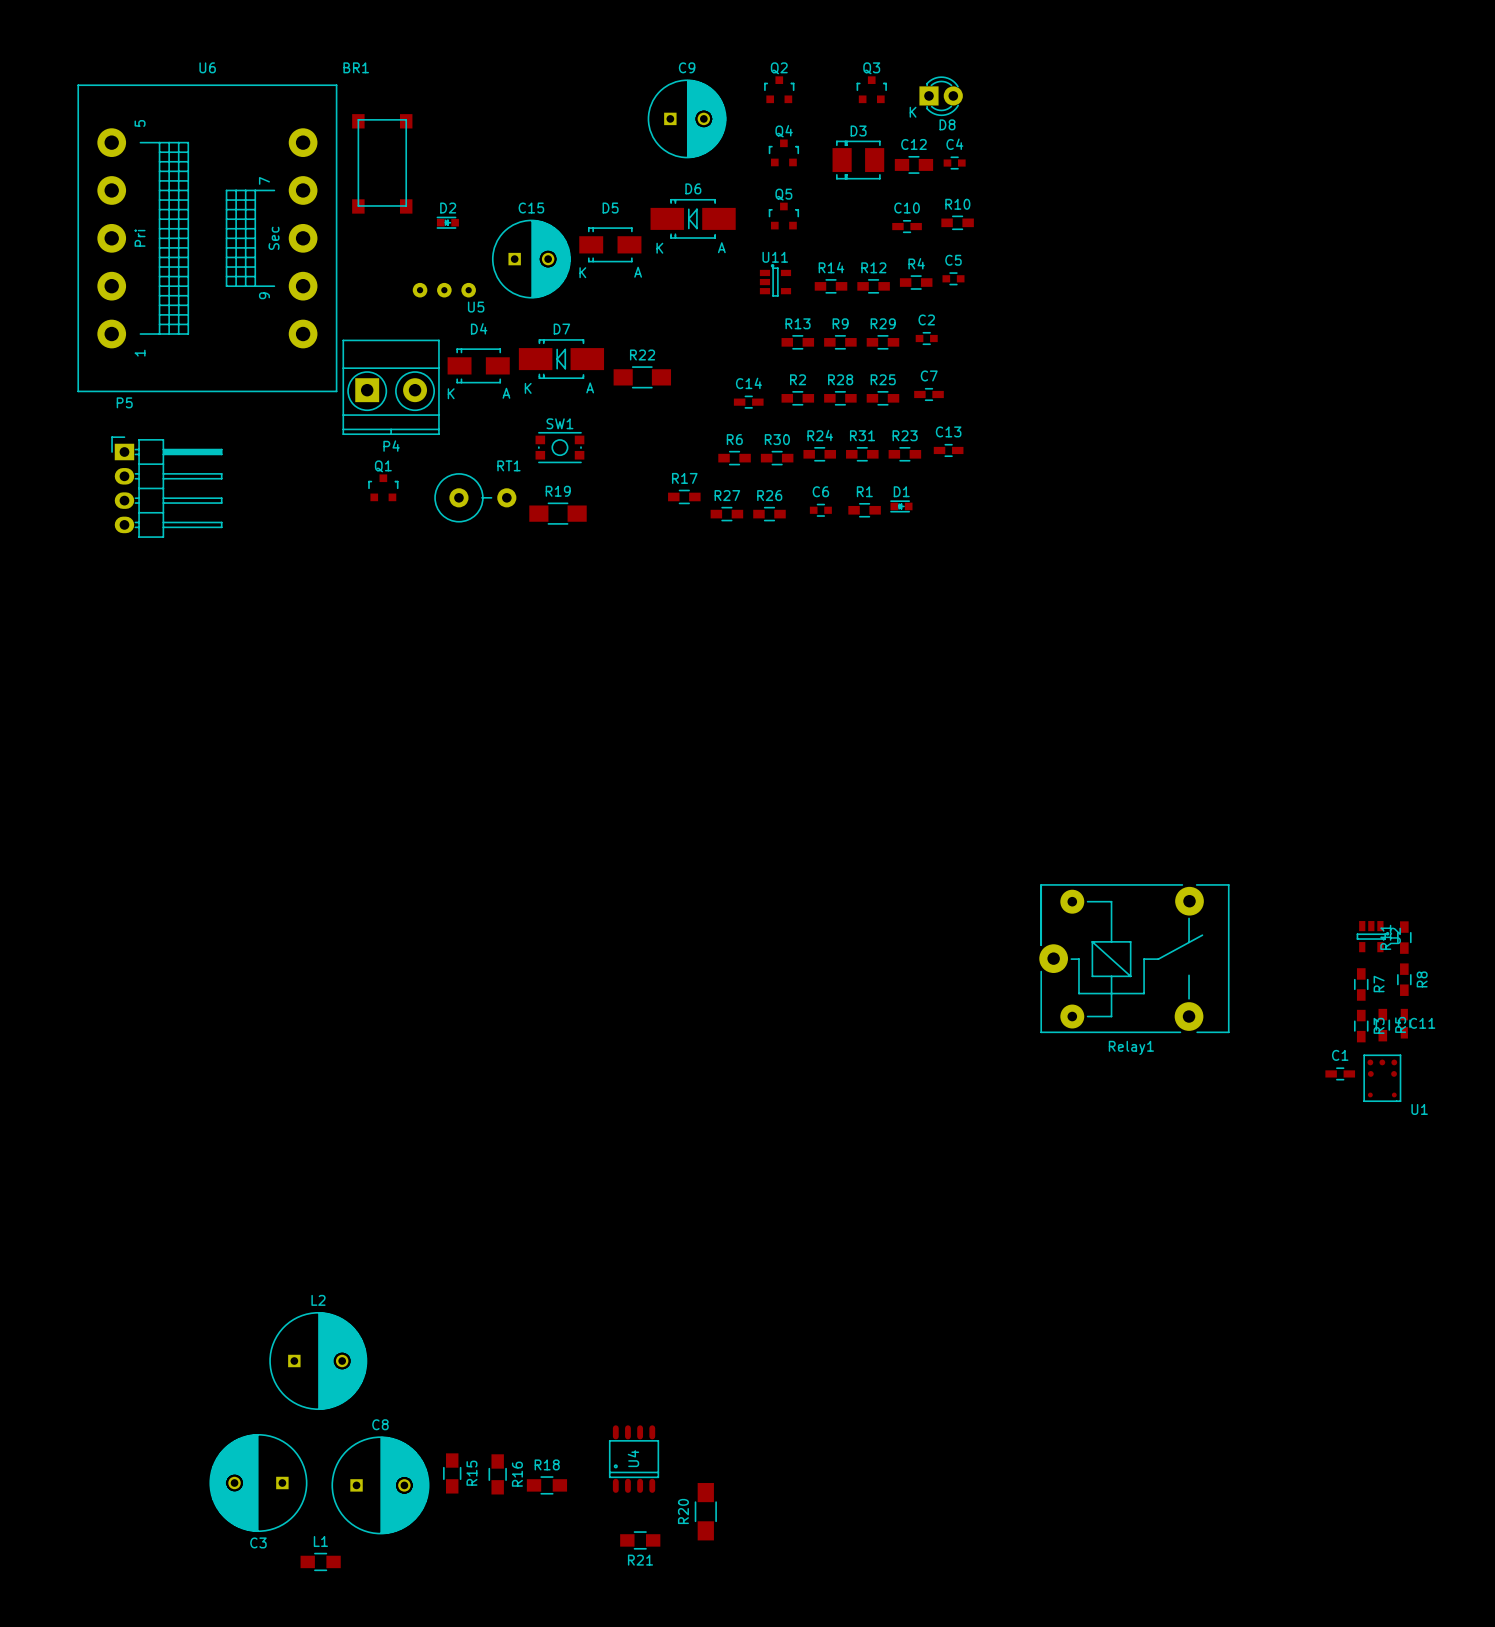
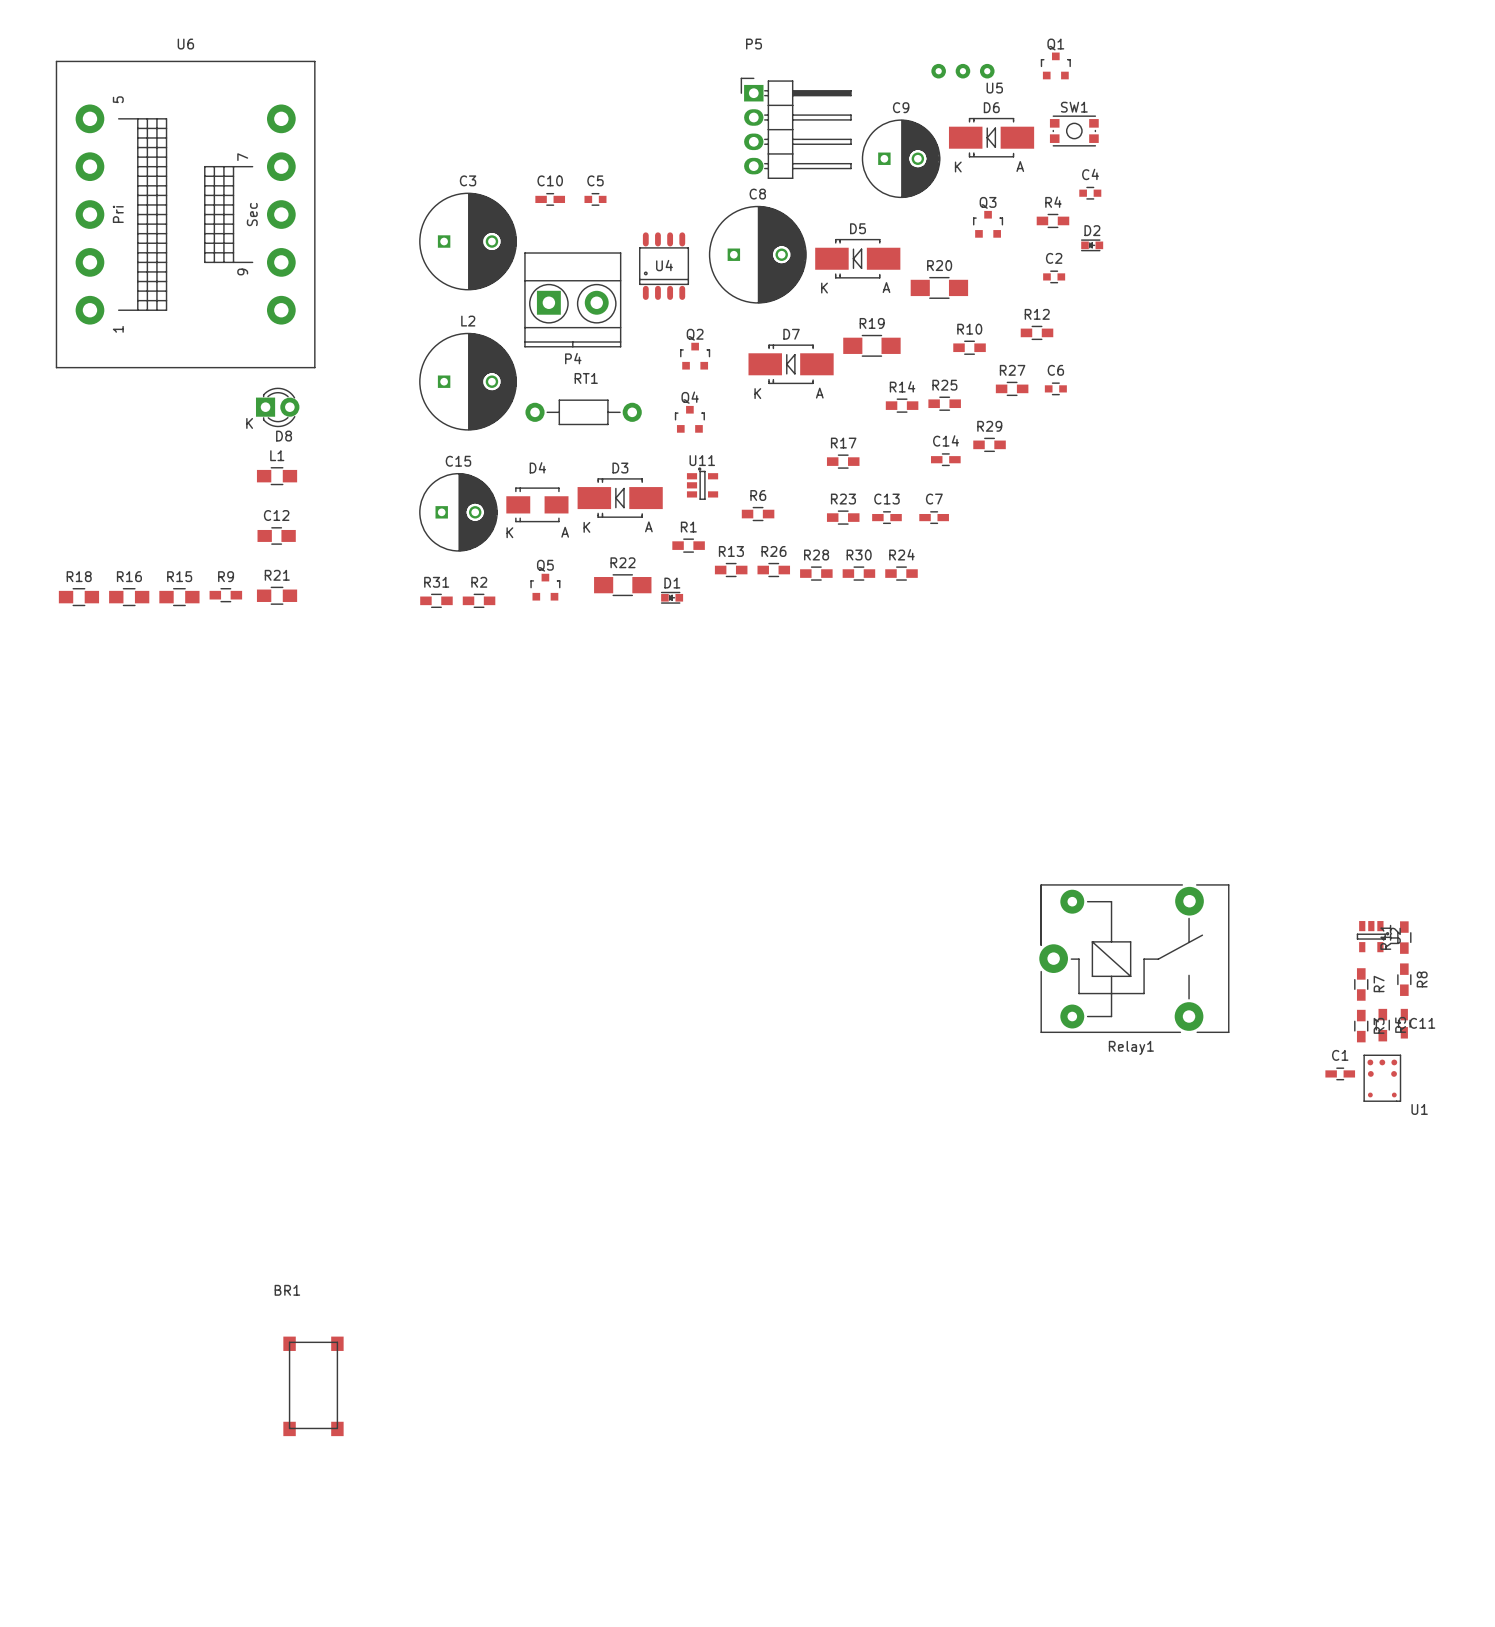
Q2 position: (779, 89) -> (695, 356)
Q3 position: (871, 89) -> (988, 224)
D8 position: (941, 96) -> (277, 407)
C9 position: (687, 118) -> (901, 158)
D3 footprint: [832, 140, 885, 180] -> [577, 478, 663, 518]
Q4 position: (783, 152) -> (689, 419)
BR1 position: (382, 163) -> (313, 1386)
C4 position: (954, 163) -> (1090, 193)
C12 position: (913, 164) -> (276, 535)
D6 footprint: [650, 199, 736, 239] -> [948, 117, 1035, 158]
Q5 position: (783, 216) -> (545, 587)
D2 position: (447, 222) -> (1092, 245)
R10 position: (957, 222) -> (969, 347)
C10 position: (907, 226) -> (550, 199)
D5 footprint: [579, 227, 642, 263] -> [815, 238, 901, 279]
U6 position: (207, 238) -> (185, 214)
C15 position: (531, 259) -> (458, 512)
C5 position: (953, 278) -> (595, 199)
U11 position: (775, 280) -> (702, 483)
R4 position: (916, 282) -> (1052, 220)
R14 position: (831, 286) -> (902, 405)
R12 position: (873, 286) -> (1037, 332)
U5 position: (444, 290) -> (962, 71)
C2 position: (926, 338) -> (1054, 276)
D7 footprint: [518, 339, 605, 379] -> [748, 344, 834, 385]
R13 position: (797, 342) -> (731, 570)
R9 position: (840, 342) -> (225, 595)
R29 position: (882, 342) -> (989, 444)
D4 position: (478, 365) -> (537, 504)
R22 position: (642, 377) -> (622, 585)
P4 position: (391, 387) -> (572, 299)
C7 position: (928, 394) -> (934, 517)
R2 position: (797, 398) -> (479, 600)
R28 position: (840, 398) -> (816, 573)
R25 position: (882, 398) -> (944, 403)
C14 position: (748, 402) -> (945, 459)
SW1 position: (559, 447) -> (1074, 131)
C13 position: (948, 450) -> (886, 517)
R24 position: (819, 454) -> (901, 573)
R31 position: (862, 454) -> (436, 600)
R23 position: (904, 454) -> (843, 517)
R6 position: (734, 458) -> (758, 514)
R30 position: (777, 458) -> (858, 573)
RT1 name position: RT1 (508, 465) -> RT1 (586, 378)
RT1 footprint: [434, 473, 517, 523] -> [525, 399, 642, 426]
P5 position: (166, 487) -> (796, 128)
Q1 position: (383, 487) -> (1055, 65)
R17 position: (684, 496) -> (843, 461)
D1 position: (901, 506) -> (671, 597)
C6 position: (820, 510) -> (1055, 388)
R1 position: (864, 510) -> (688, 545)
R19 position: (558, 513) -> (871, 345)
R27 position: (726, 514) -> (1012, 388)
R26 position: (769, 514) -> (773, 570)
L2 position: (318, 1361) -> (468, 381)
U4 name rotation: 0° (633, 1458) -> 90° clockwise (664, 265)
U4 position: (634, 1459) -> (664, 266)
R15 rotation: 0° (452, 1473) -> 90° clockwise (179, 597)
R15 position: (452, 1473) -> (179, 597)
R15 name position: R15 (471, 1473) -> R15 (179, 576)
R16 rotation: 0° (497, 1474) -> 90° clockwise (129, 597)
R16 position: (497, 1474) -> (129, 597)
R16 name position: R16 (517, 1474) -> R16 (129, 576)
C3 rotation: 0° (258, 1483) -> 180° (468, 241)
C3 position: (258, 1483) -> (468, 241)
C8 position: (380, 1485) -> (757, 254)
R18 position: (546, 1485) -> (78, 597)
R20 rotation: 0° (705, 1511) -> 90° clockwise (939, 287)
R20 position: (705, 1511) -> (939, 287)
R21 position: (640, 1540) -> (277, 595)
R21 name position: R21 (640, 1560) -> R21 (277, 575)
L1 position: (320, 1561) -> (277, 476)

